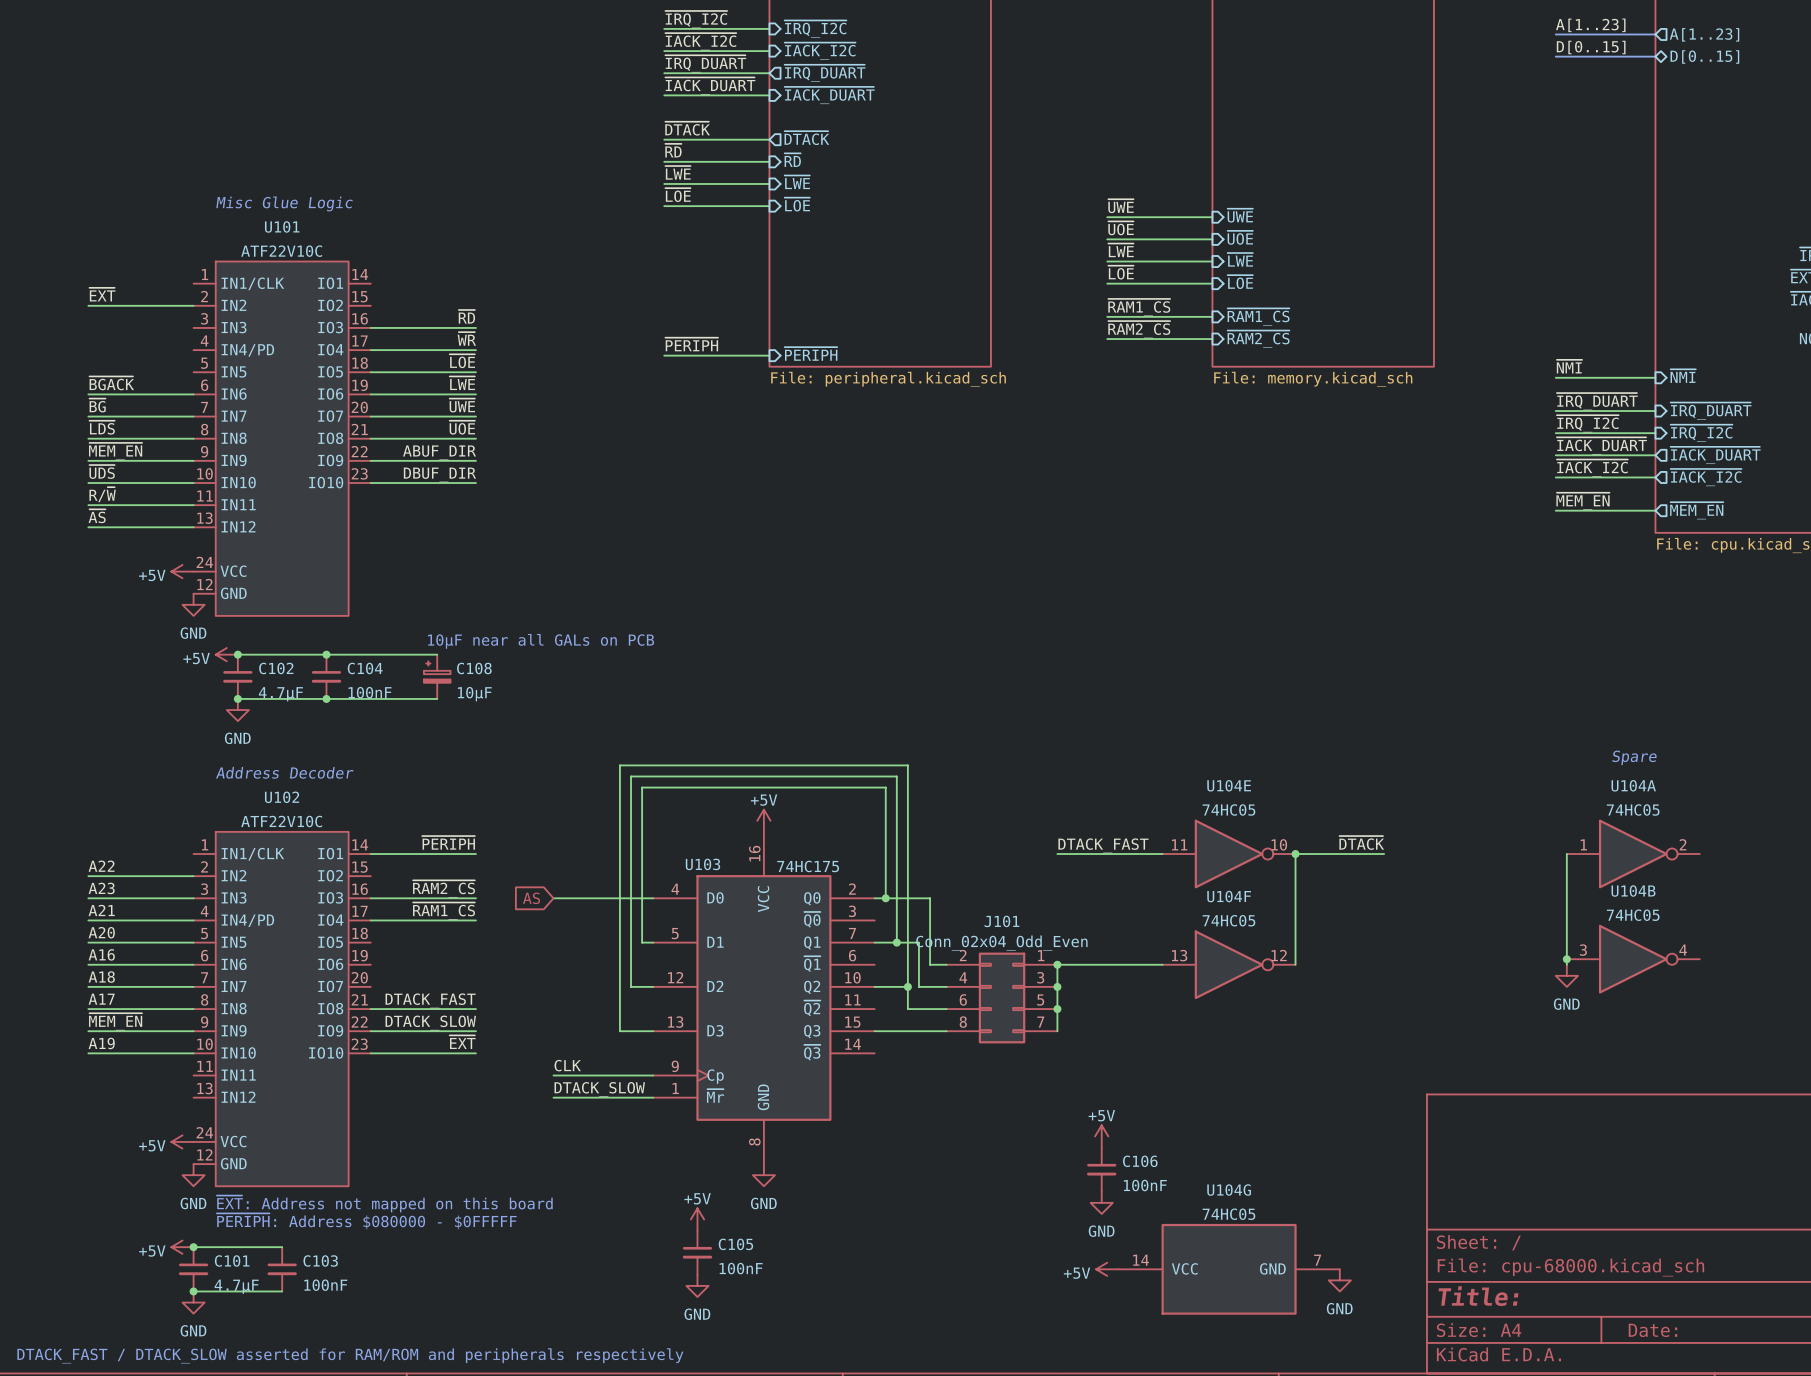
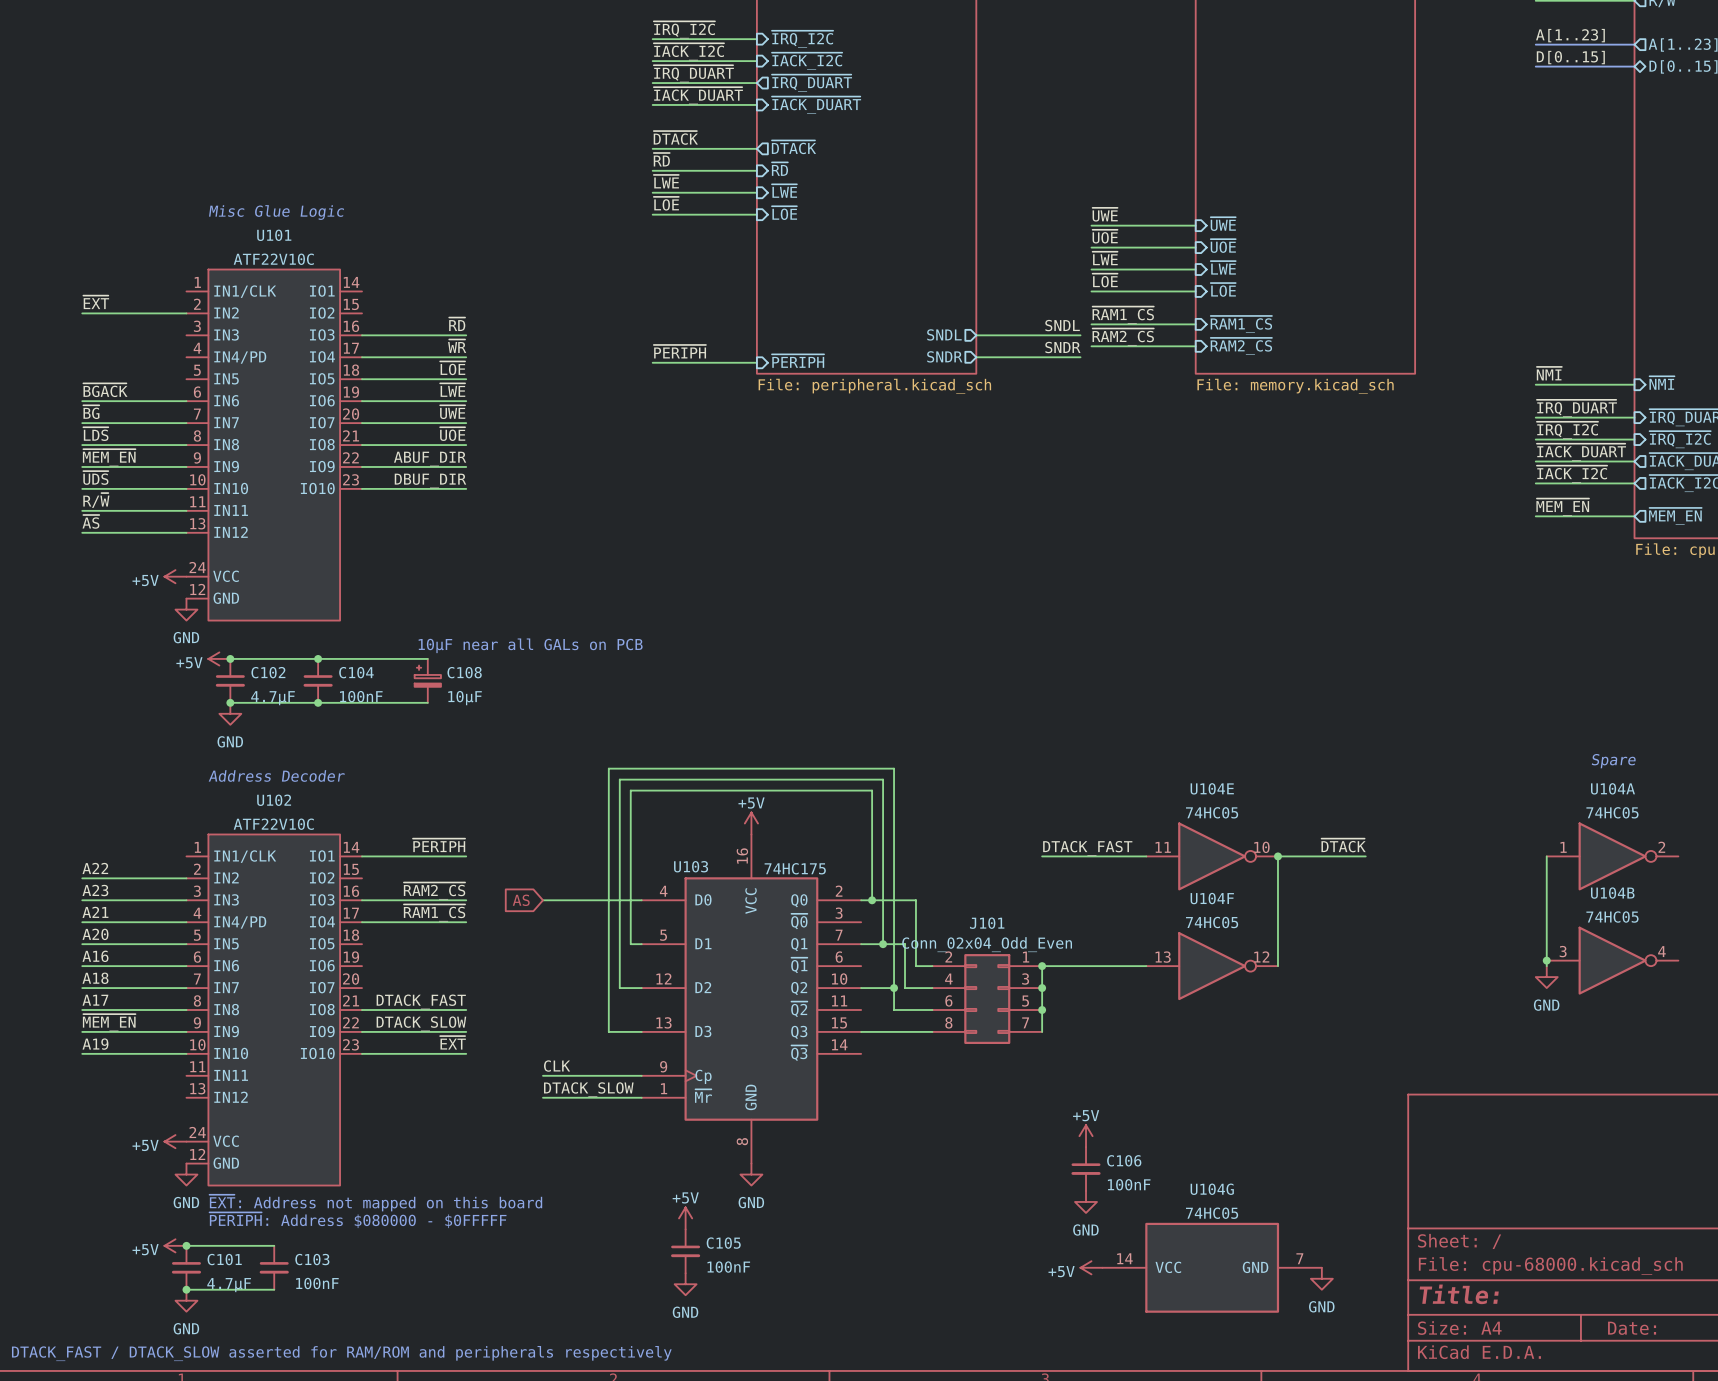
label: none -> SNDL (1062, 325)
sheet pin: none -> SNDL (944, 334)
wire: none -> (976, 335) (1080, 335)
label: none -> SNDR (1062, 347)
sheet pin: none -> SNDR (944, 356)
wire: none -> (976, 357) (1080, 357)

